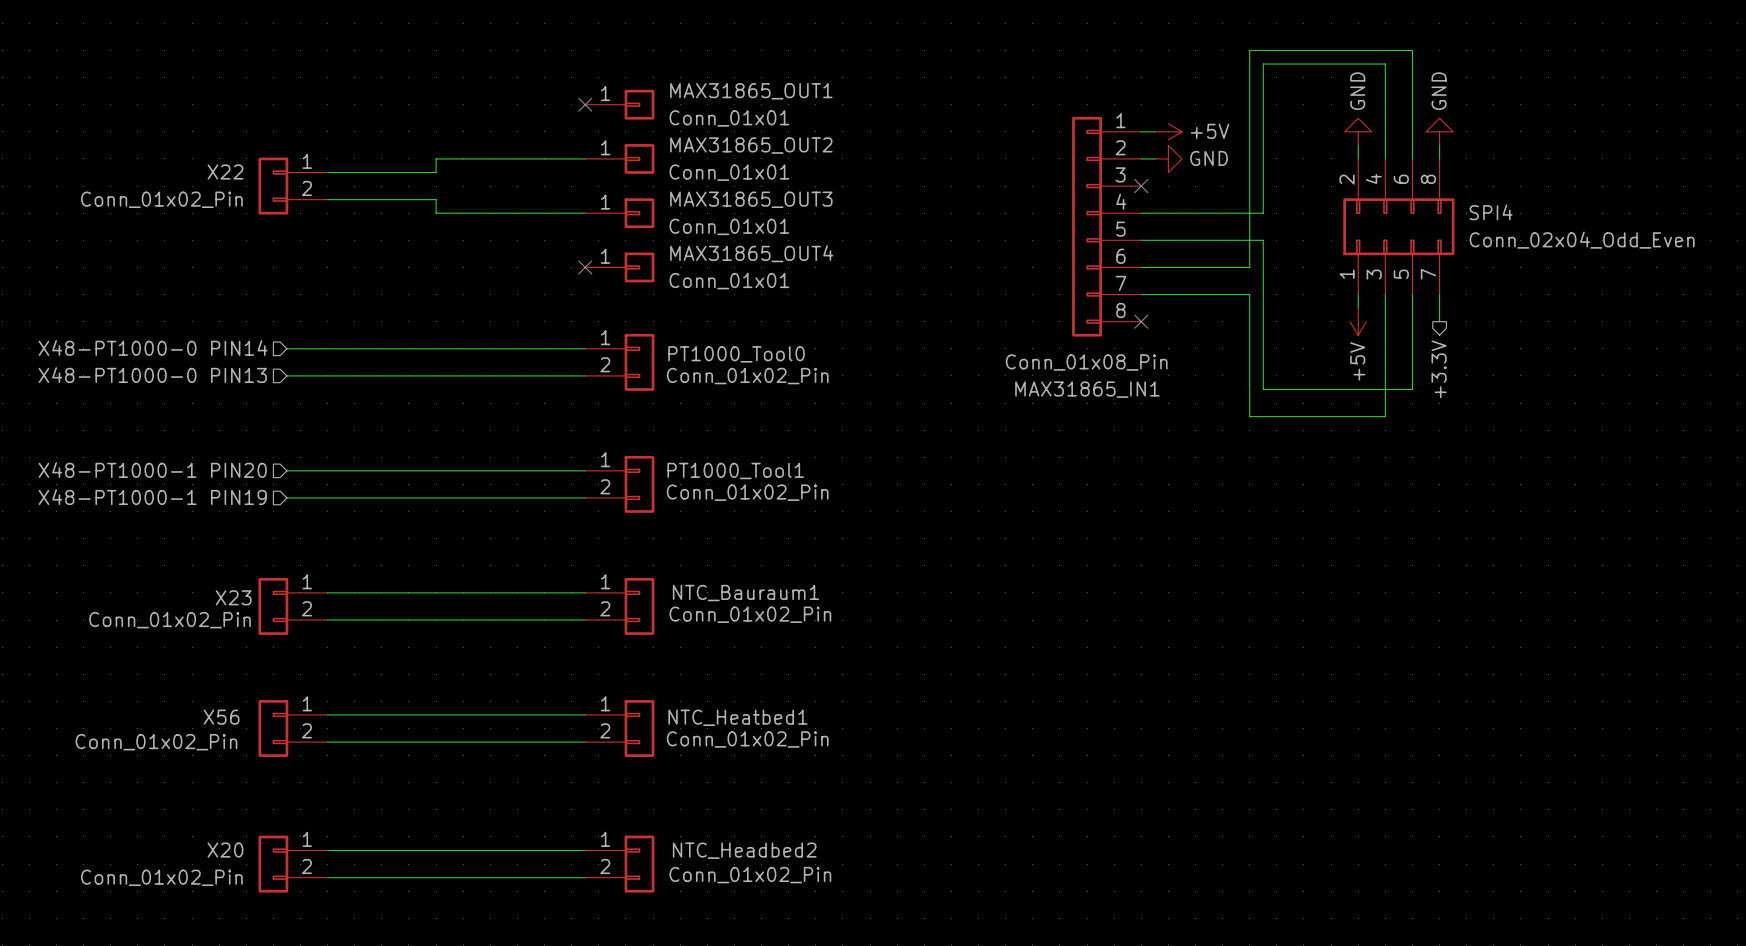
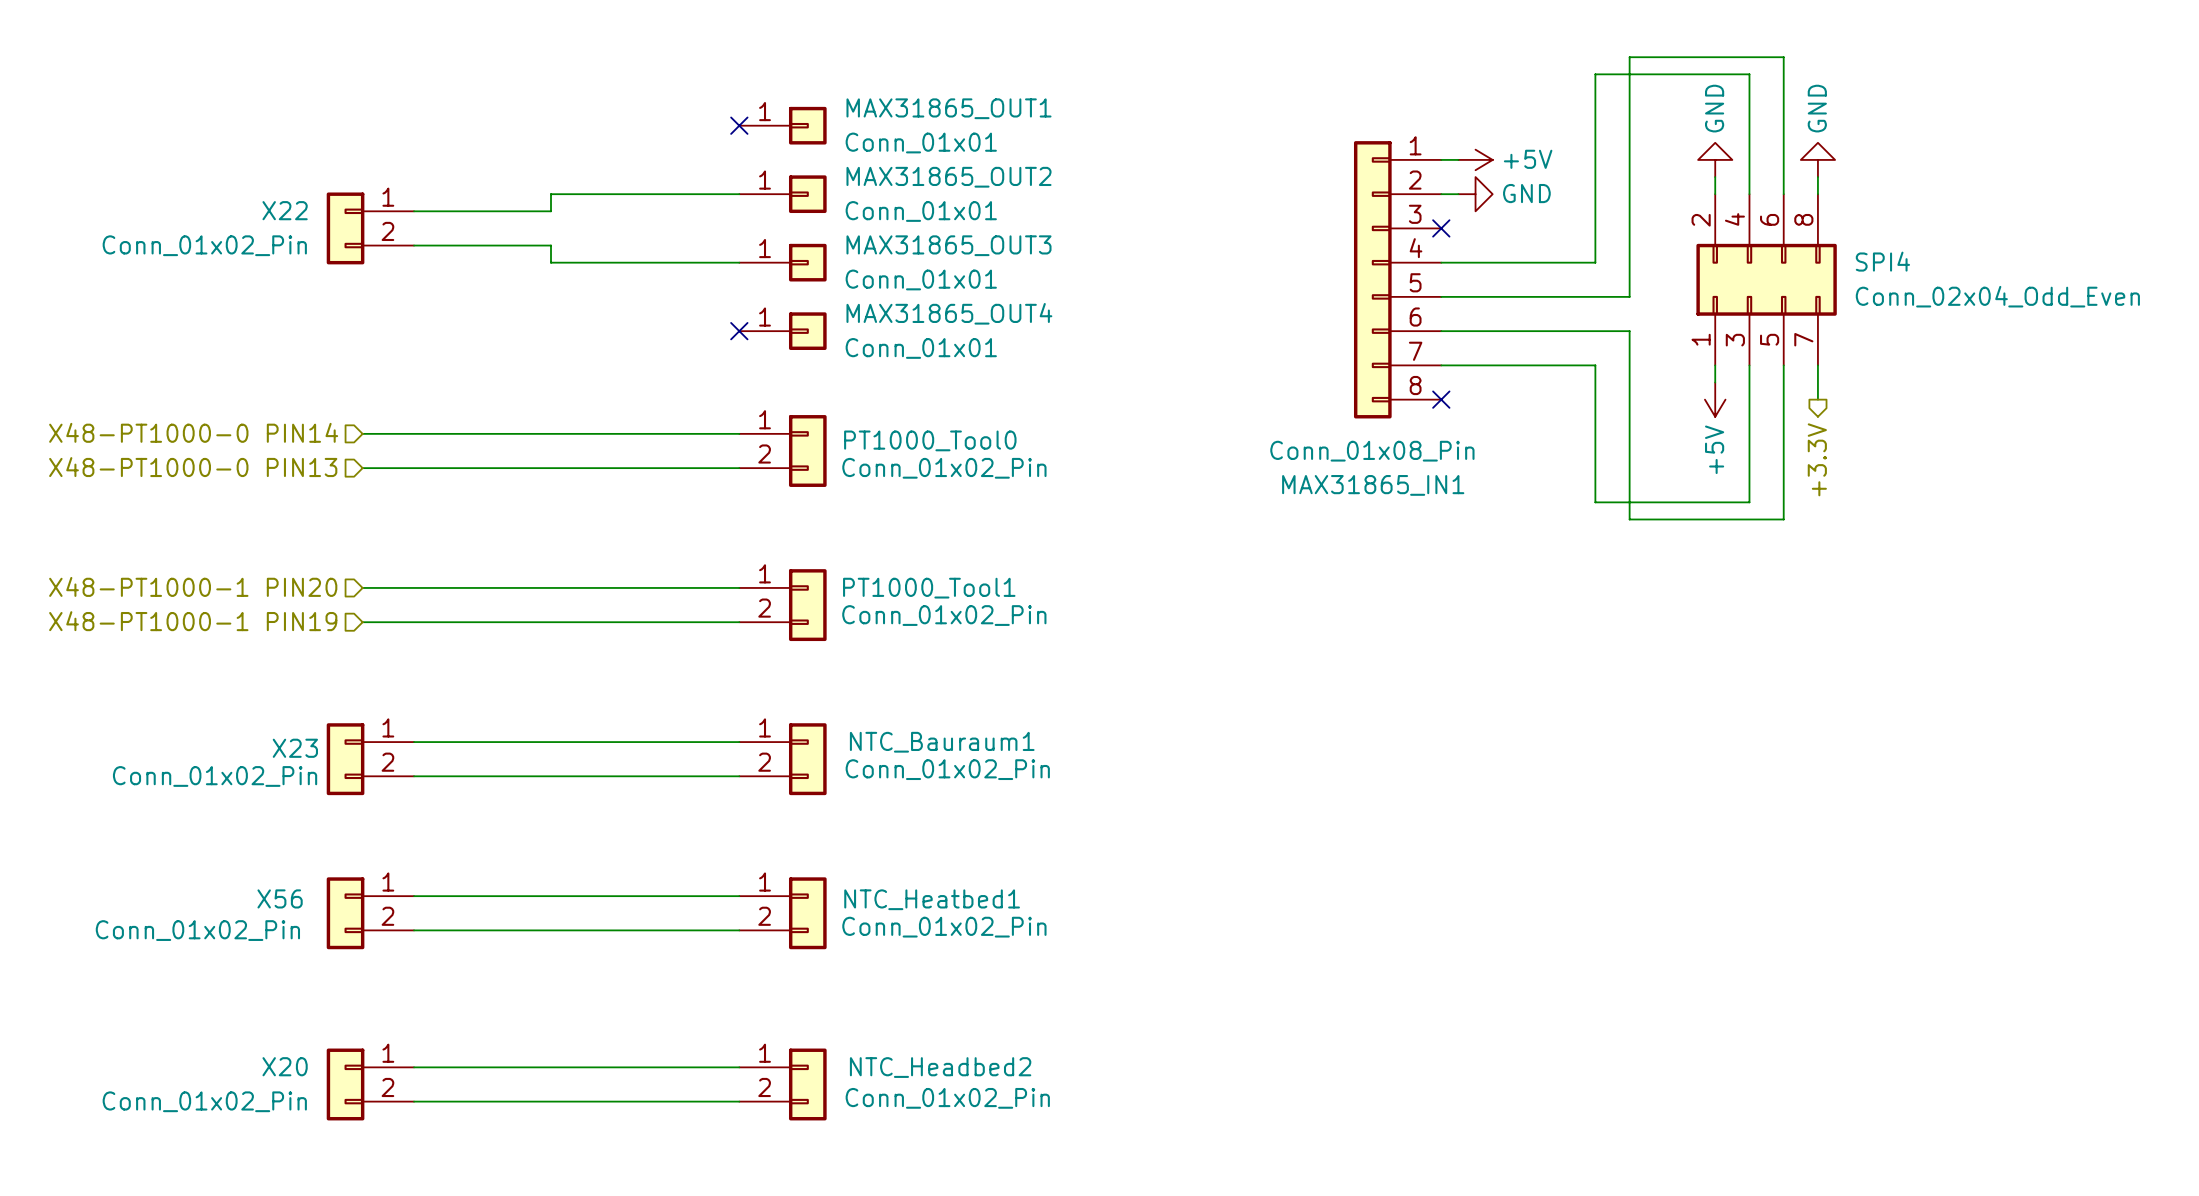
wire: (1290, 50) (1249, 50) (1249, 267) -> (1629, 57) (1629, 296) (1595, 296)
wire: (1263, 240) (1263, 294) -> (1578, 365) (1595, 365)
wire: (1249, 294) (1249, 416) (1290, 416) -> (1578, 331) (1629, 331) (1629, 519)
wire: (1263, 389) (1412, 389) -> (1595, 485) (1595, 502) (1749, 502)
wire: (1385, 403) (1385, 416) -> (1783, 485) (1783, 519) (1749, 519)

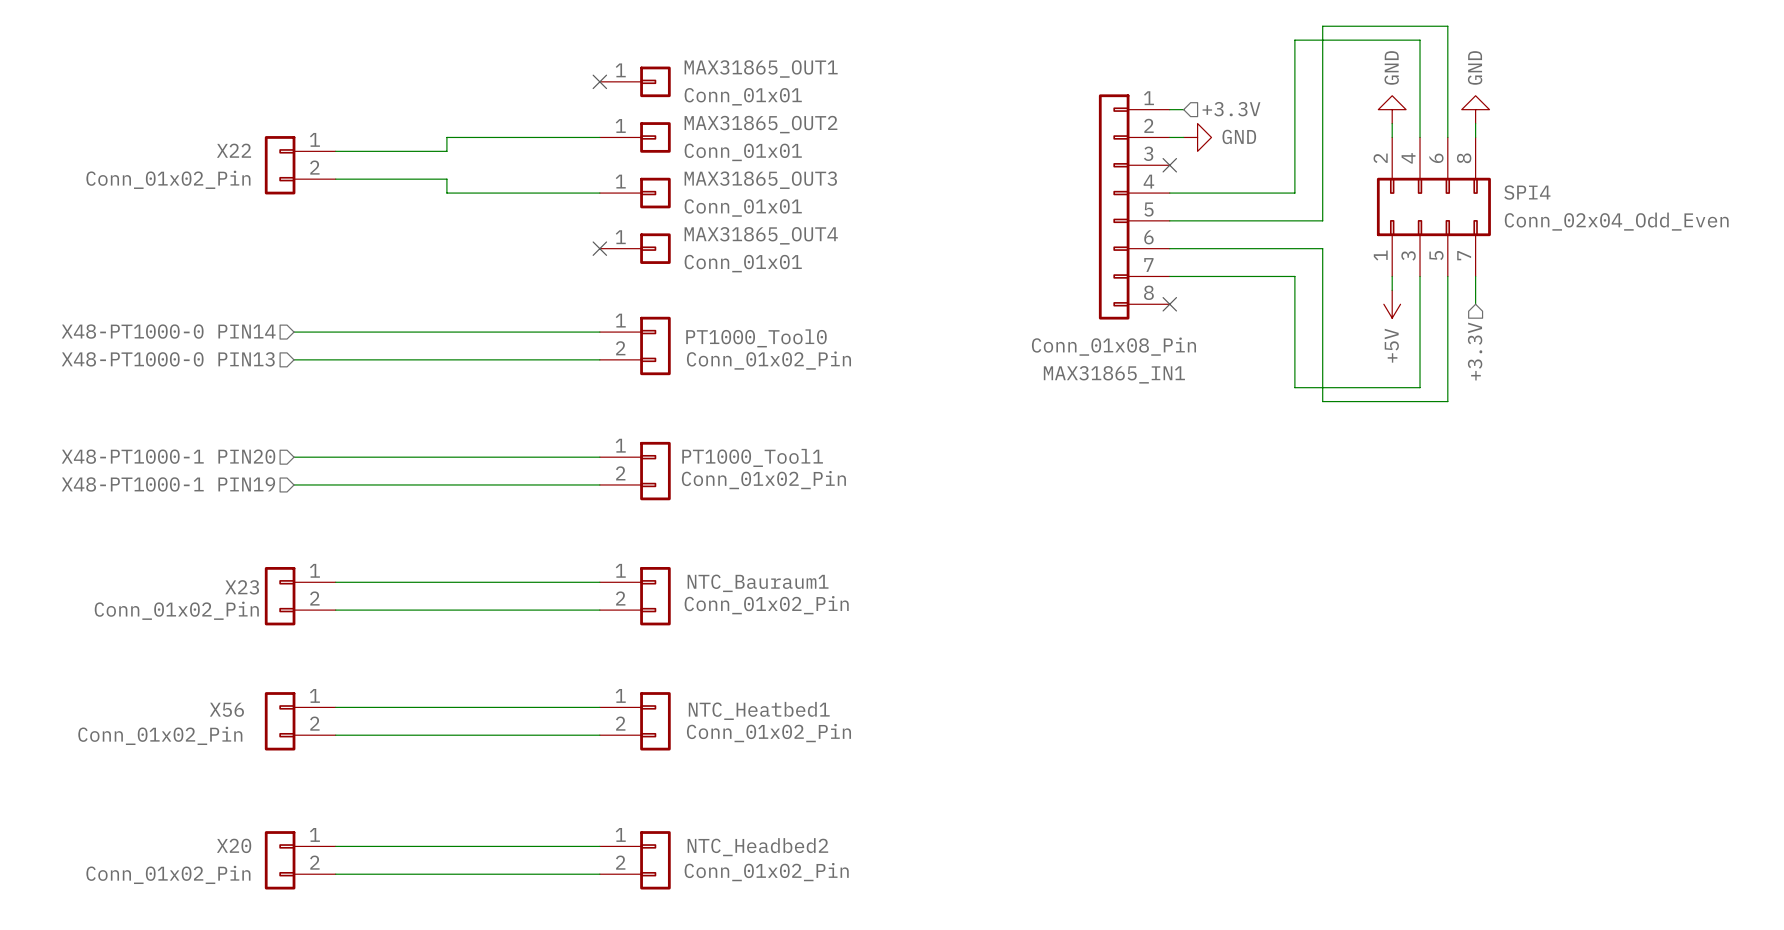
power symbol: +5V (1475, 159) -> none
hierarchical label: none -> +3.3V (1231, 109)
hierarchical label shape: output (1817, 459) -> input (1475, 351)

